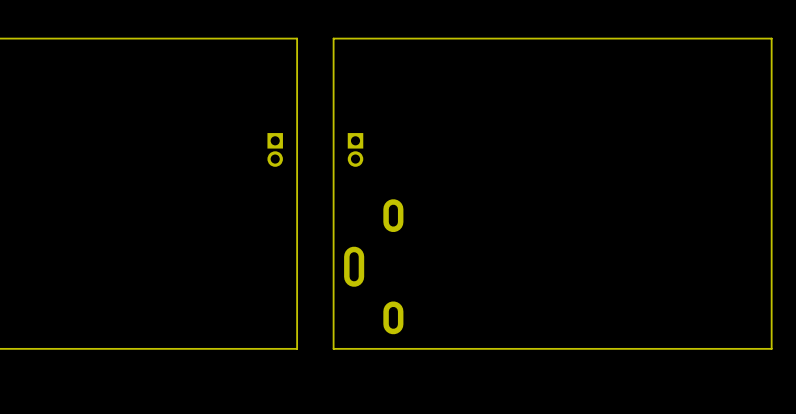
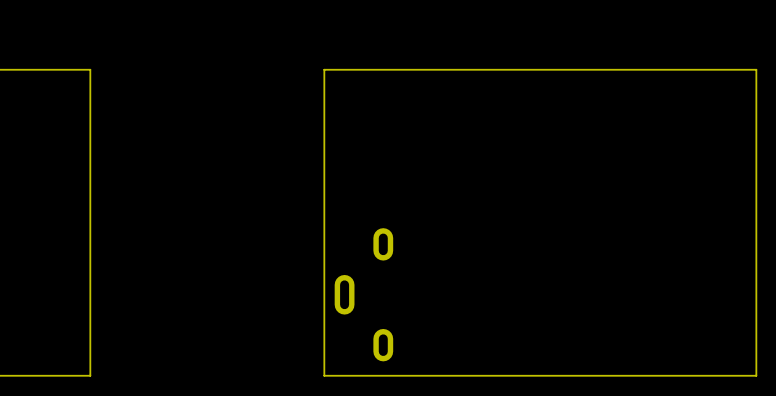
board edge: (96, 38) (297, 38) (297, 348) (96, 348) -> (90, 69) (90, 375)
part: (275, 149) -> none
part: (355, 149) -> none

